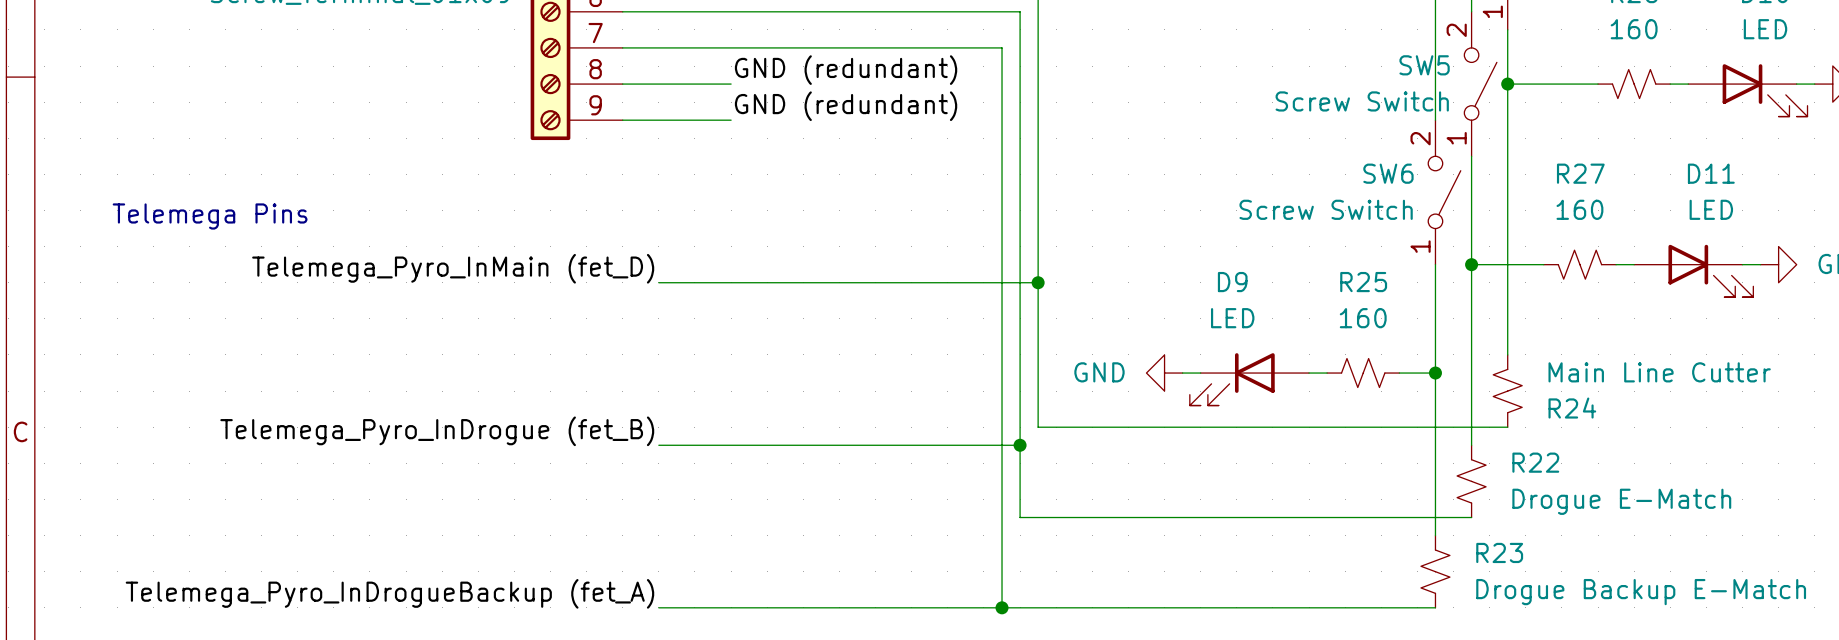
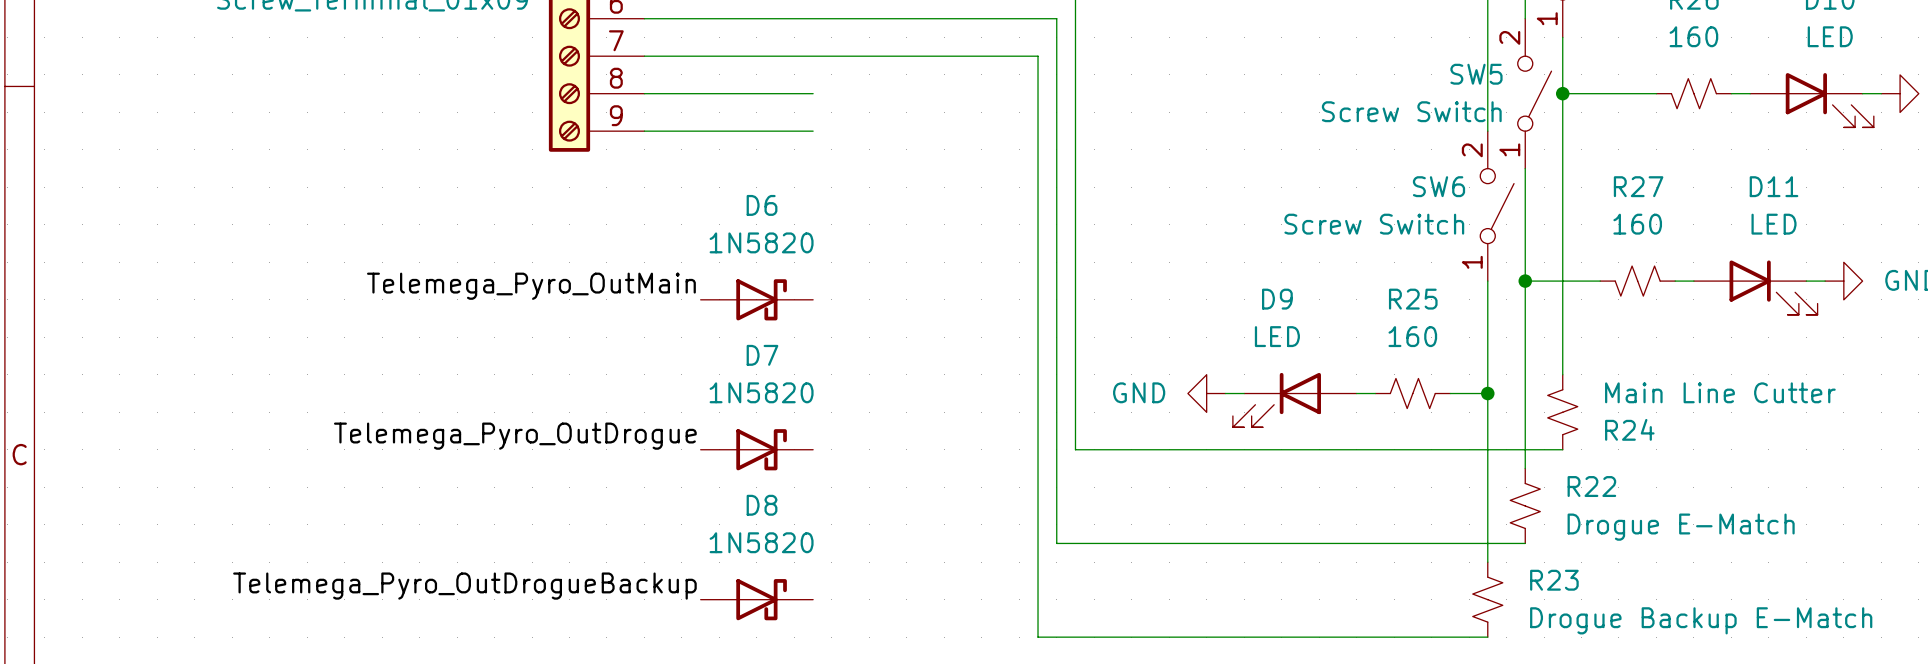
label: GND (redundant) (846, 70) -> none
wire: none -> (756, 93) (813, 93)
label: GND (redundant) (846, 106) -> none
wire: none -> (756, 131) (813, 131)
text: Telemega Pins (210, 216) -> none
label: Telemega_Pyro_InMain (fet_D) (453, 268) -> Telemega_Pyro_OutMain (531, 286)
wire: (658, 282) (1038, 282) -> none
D6: none -> 1N5820 (756, 299)
junction: (1038, 282) -> none
D7: none -> 1N5820 (756, 449)
label: Telemega_Pyro_InDrogue (fet_B) (437, 431) -> Telemega_Pyro_OutDrogue (515, 436)
wire: (658, 445) (1020, 445) -> none
junction: (1020, 445) -> none
D8: none -> 1N5820 (756, 599)
label: Telemega_Pyro_InDrogueBackup (fet_A) (389, 593) -> Telemega_Pyro_OutDrogueBackup (464, 586)
wire: (658, 607) (1002, 607) -> none
junction: (1002, 607) -> none

